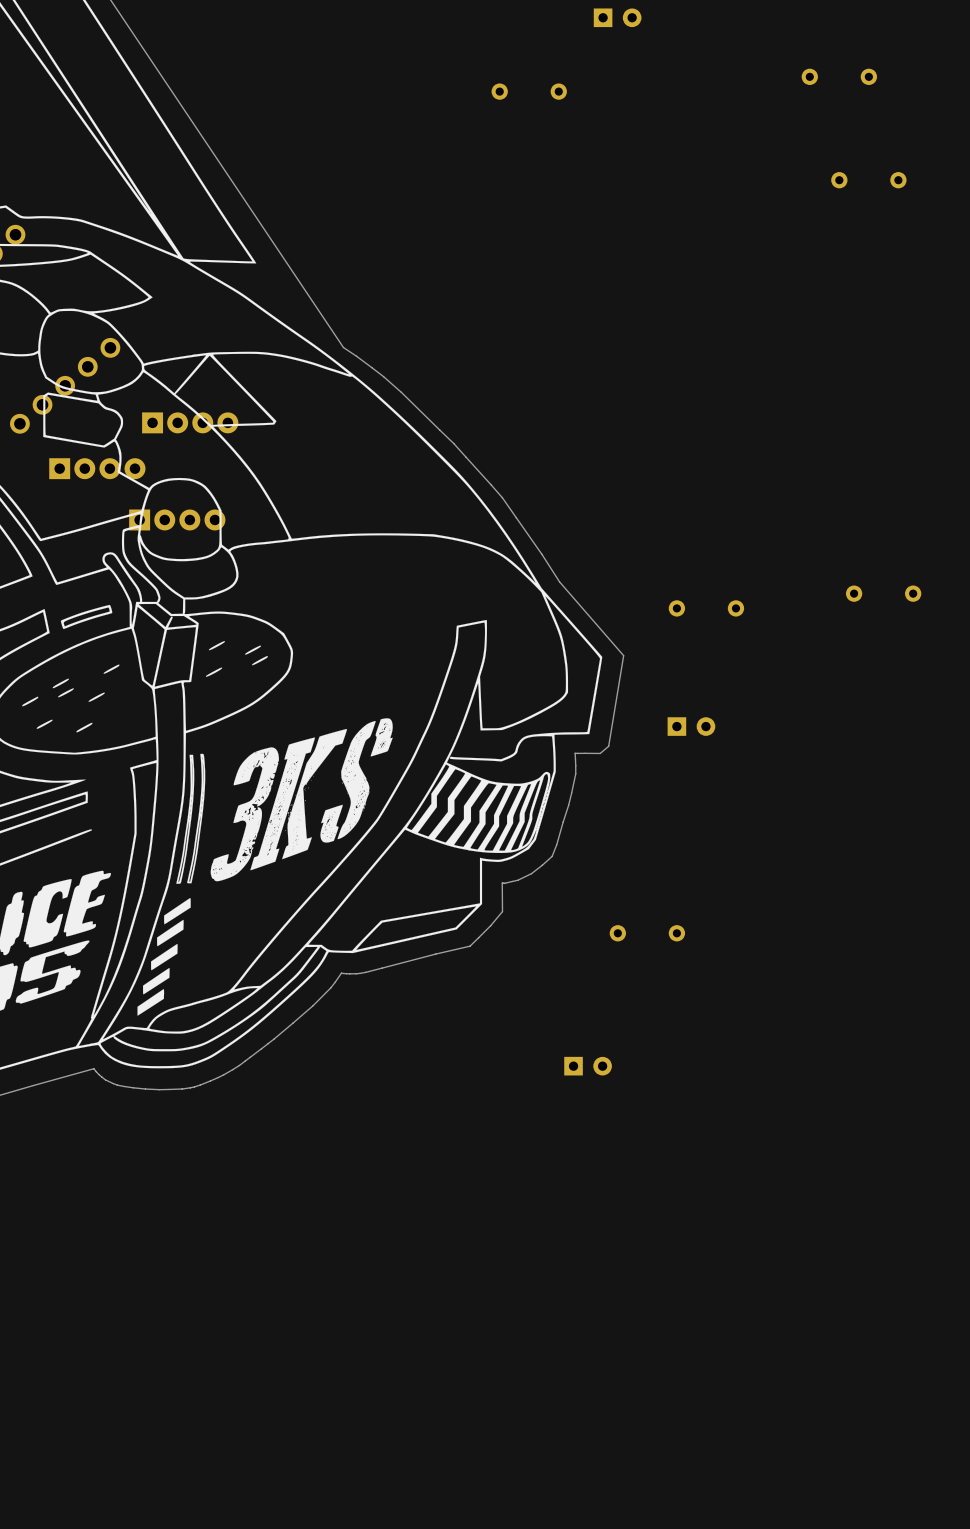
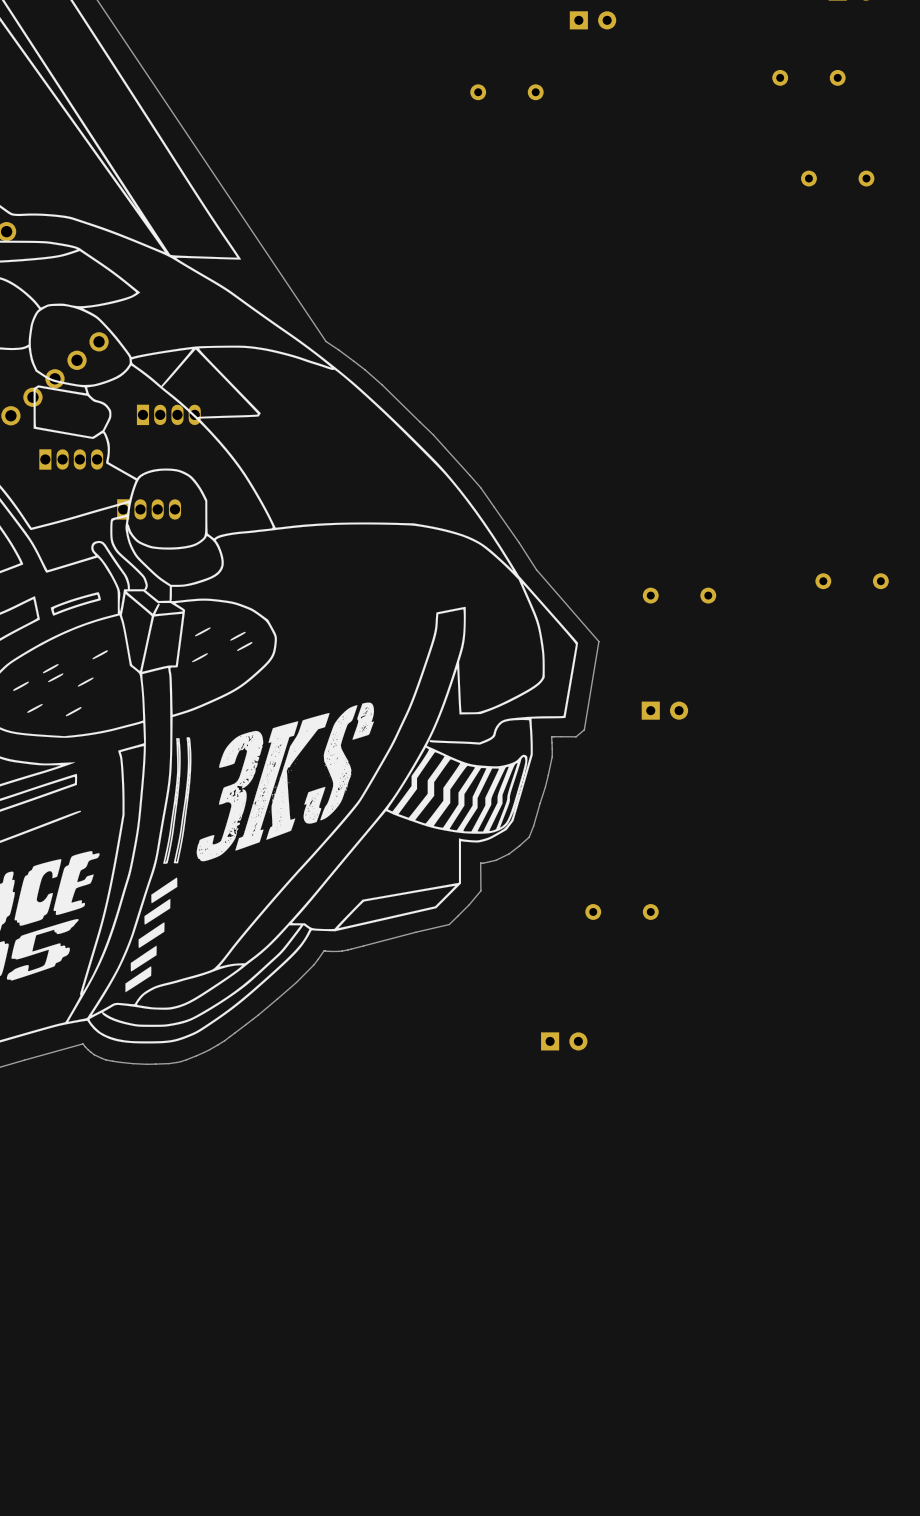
part footprint: [142, 412, 239, 434] -> [136, 404, 201, 426]
part: none -> (71, 459)
part: (97, 468) -> none
part: none -> (149, 509)
part: (177, 519) -> none

